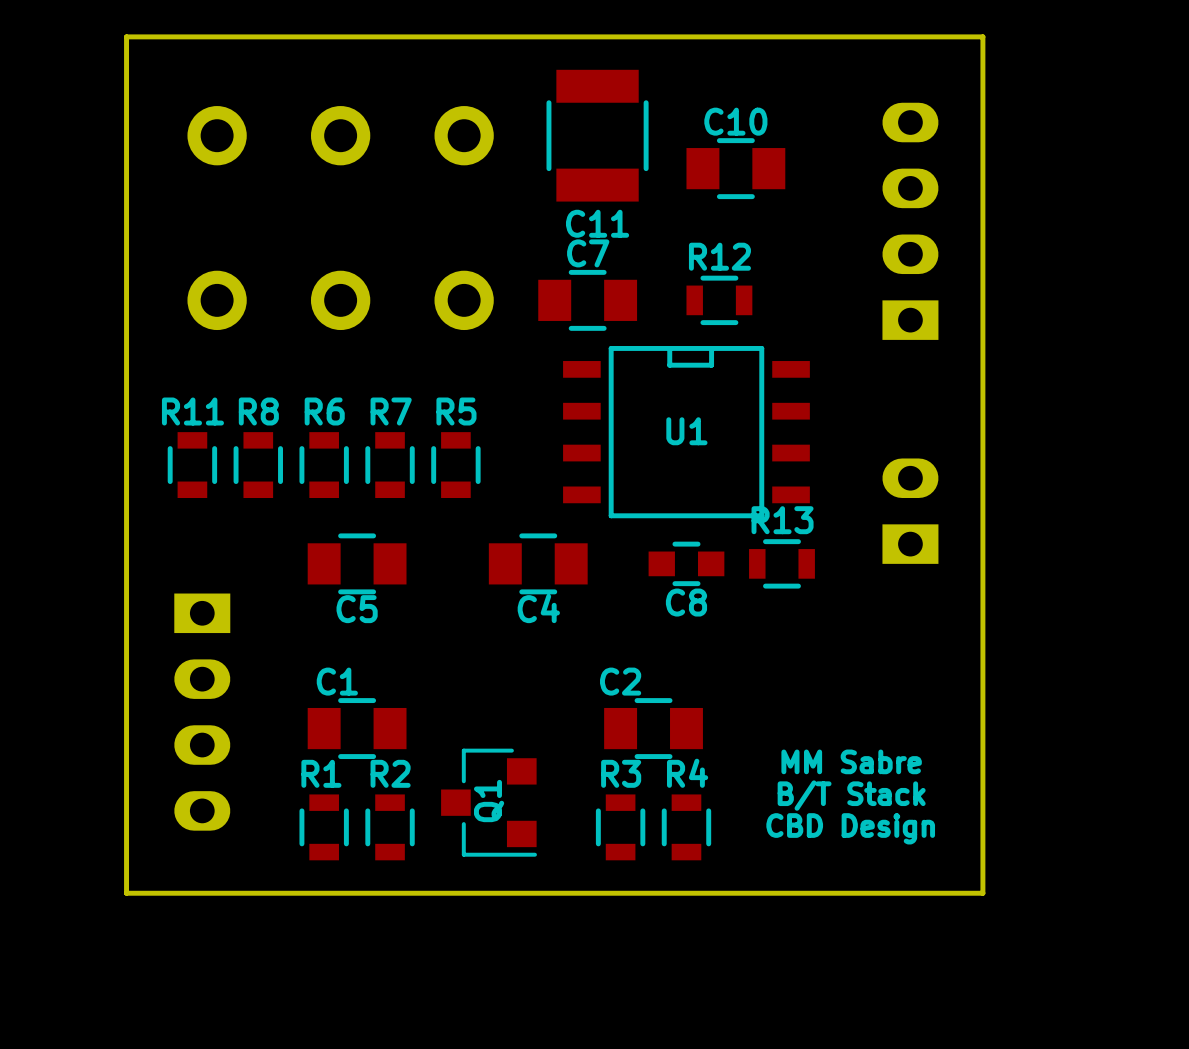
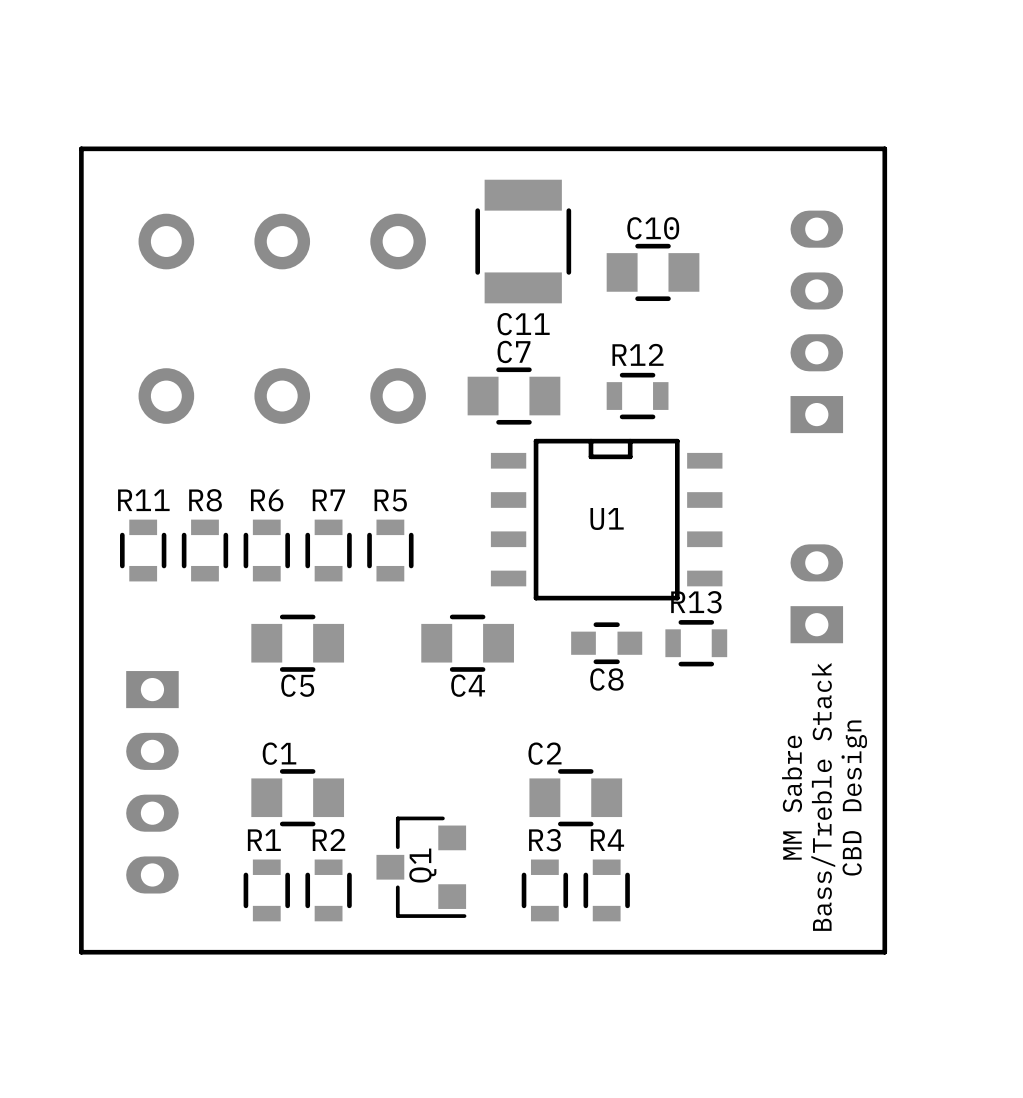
text rotation: 0° (851, 761) -> 90° counterclockwise (792, 797)
text: B/T Stack (851, 795) -> Bass/Treble Stack (823, 796)
text rotation: 0° (850, 828) -> 90° counterclockwise (854, 798)

